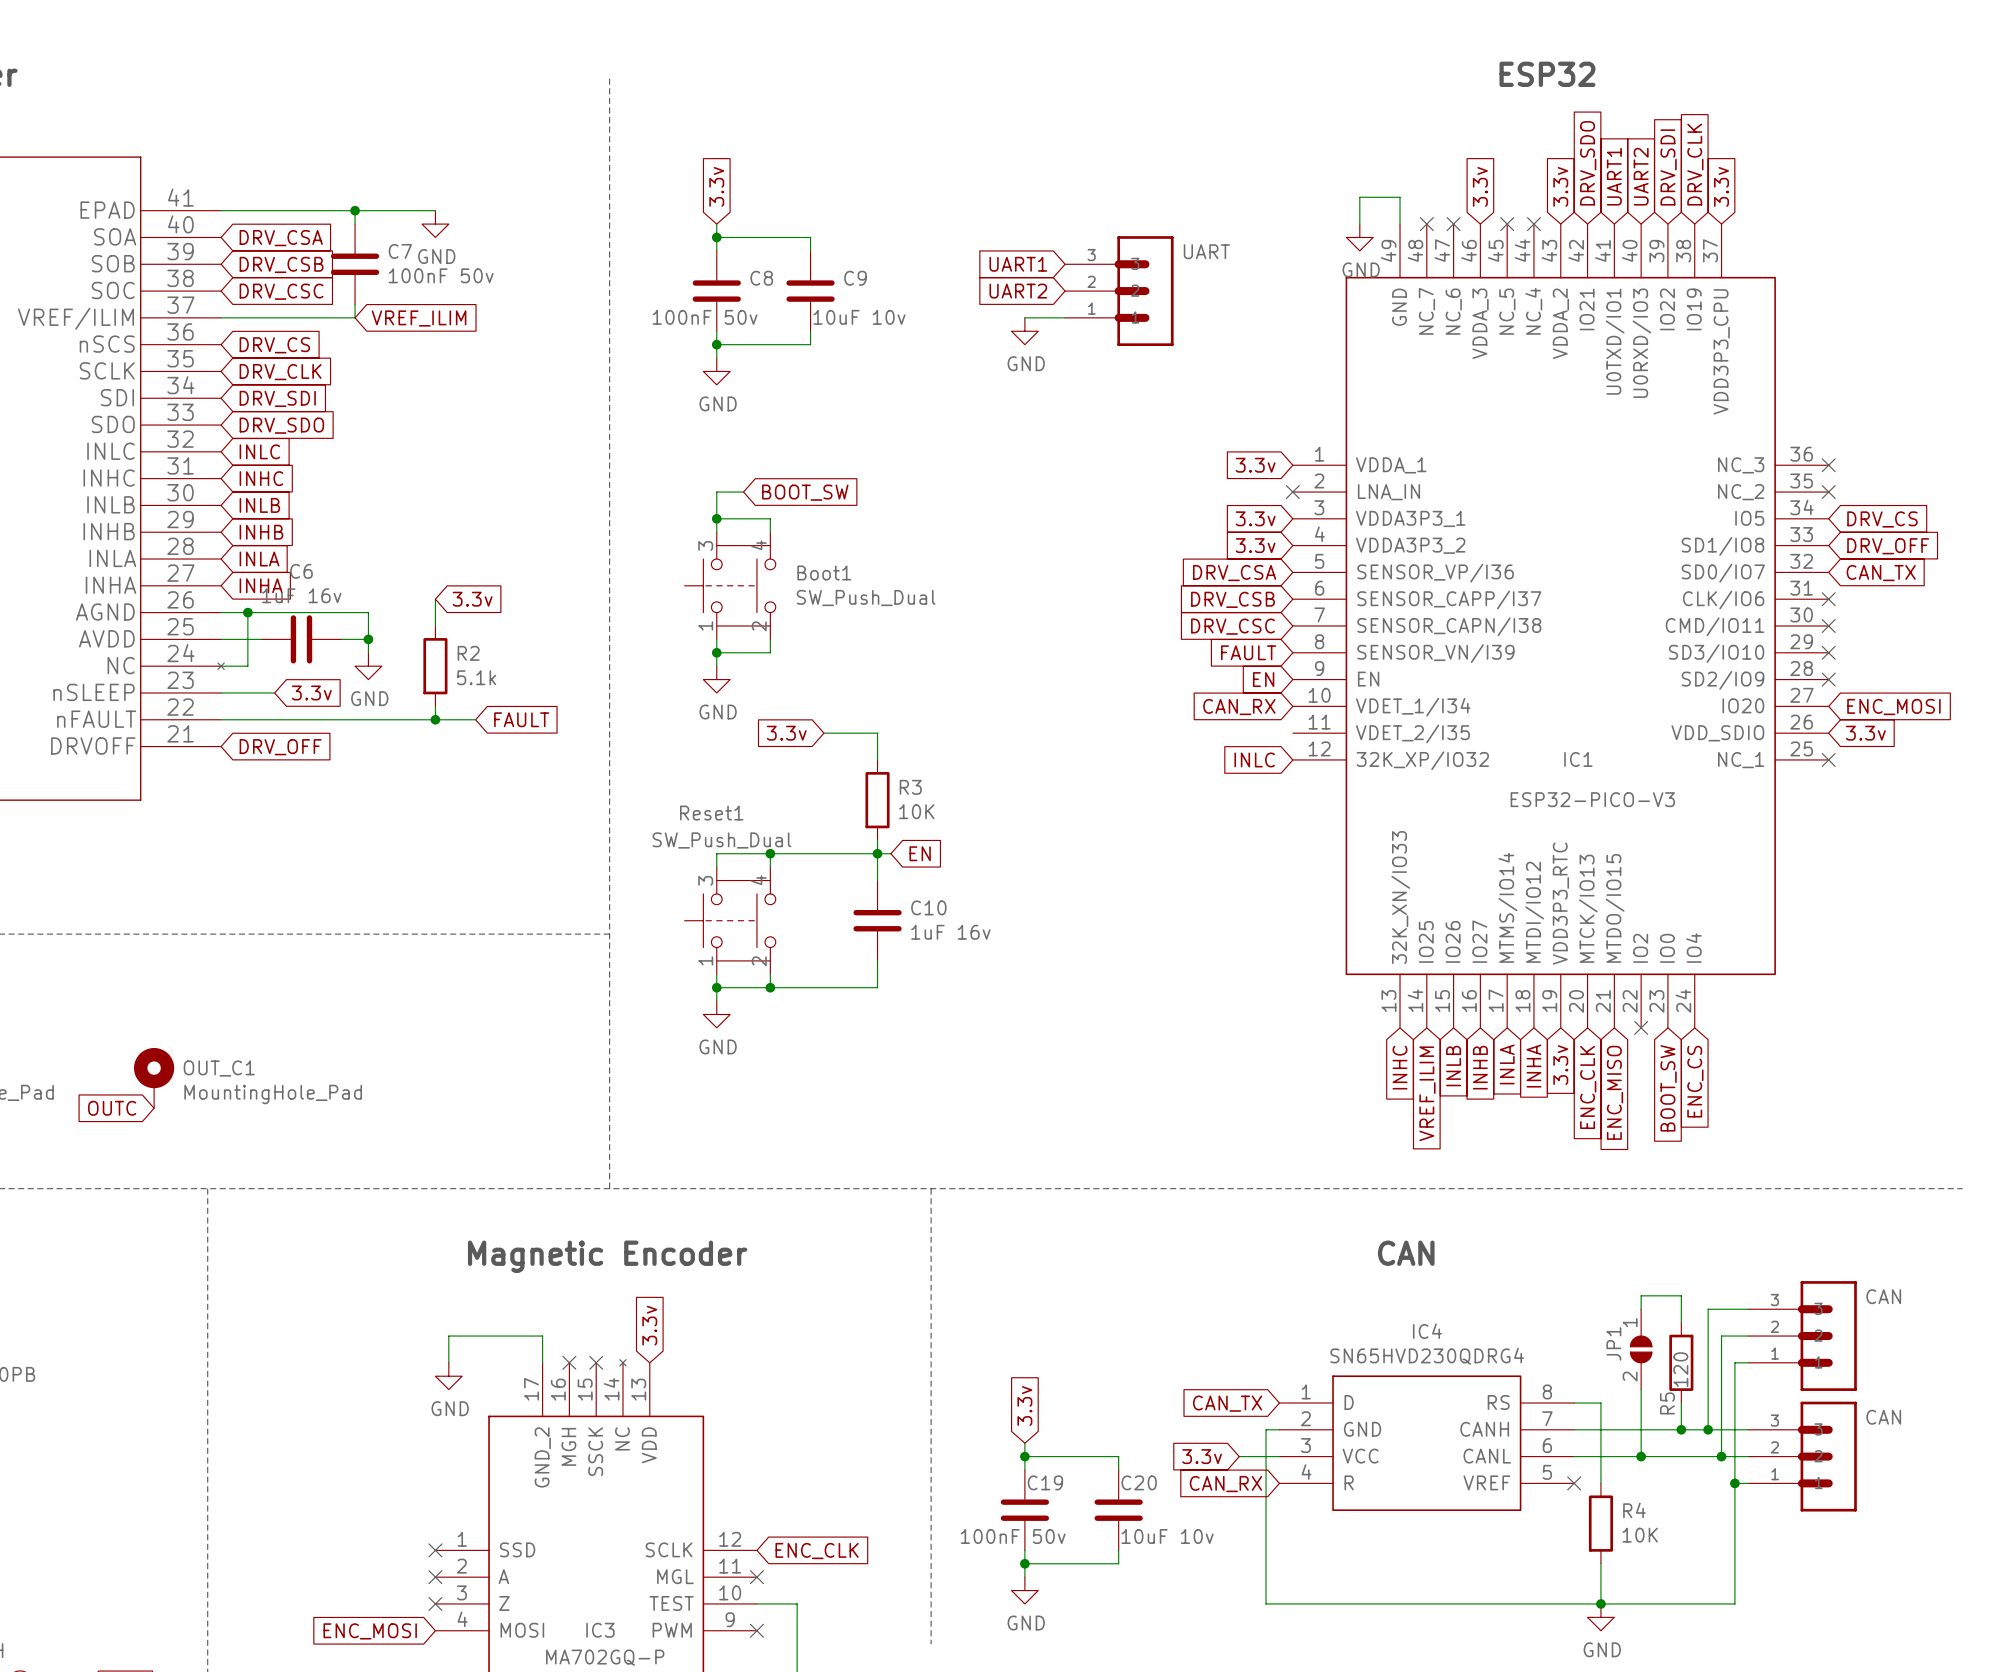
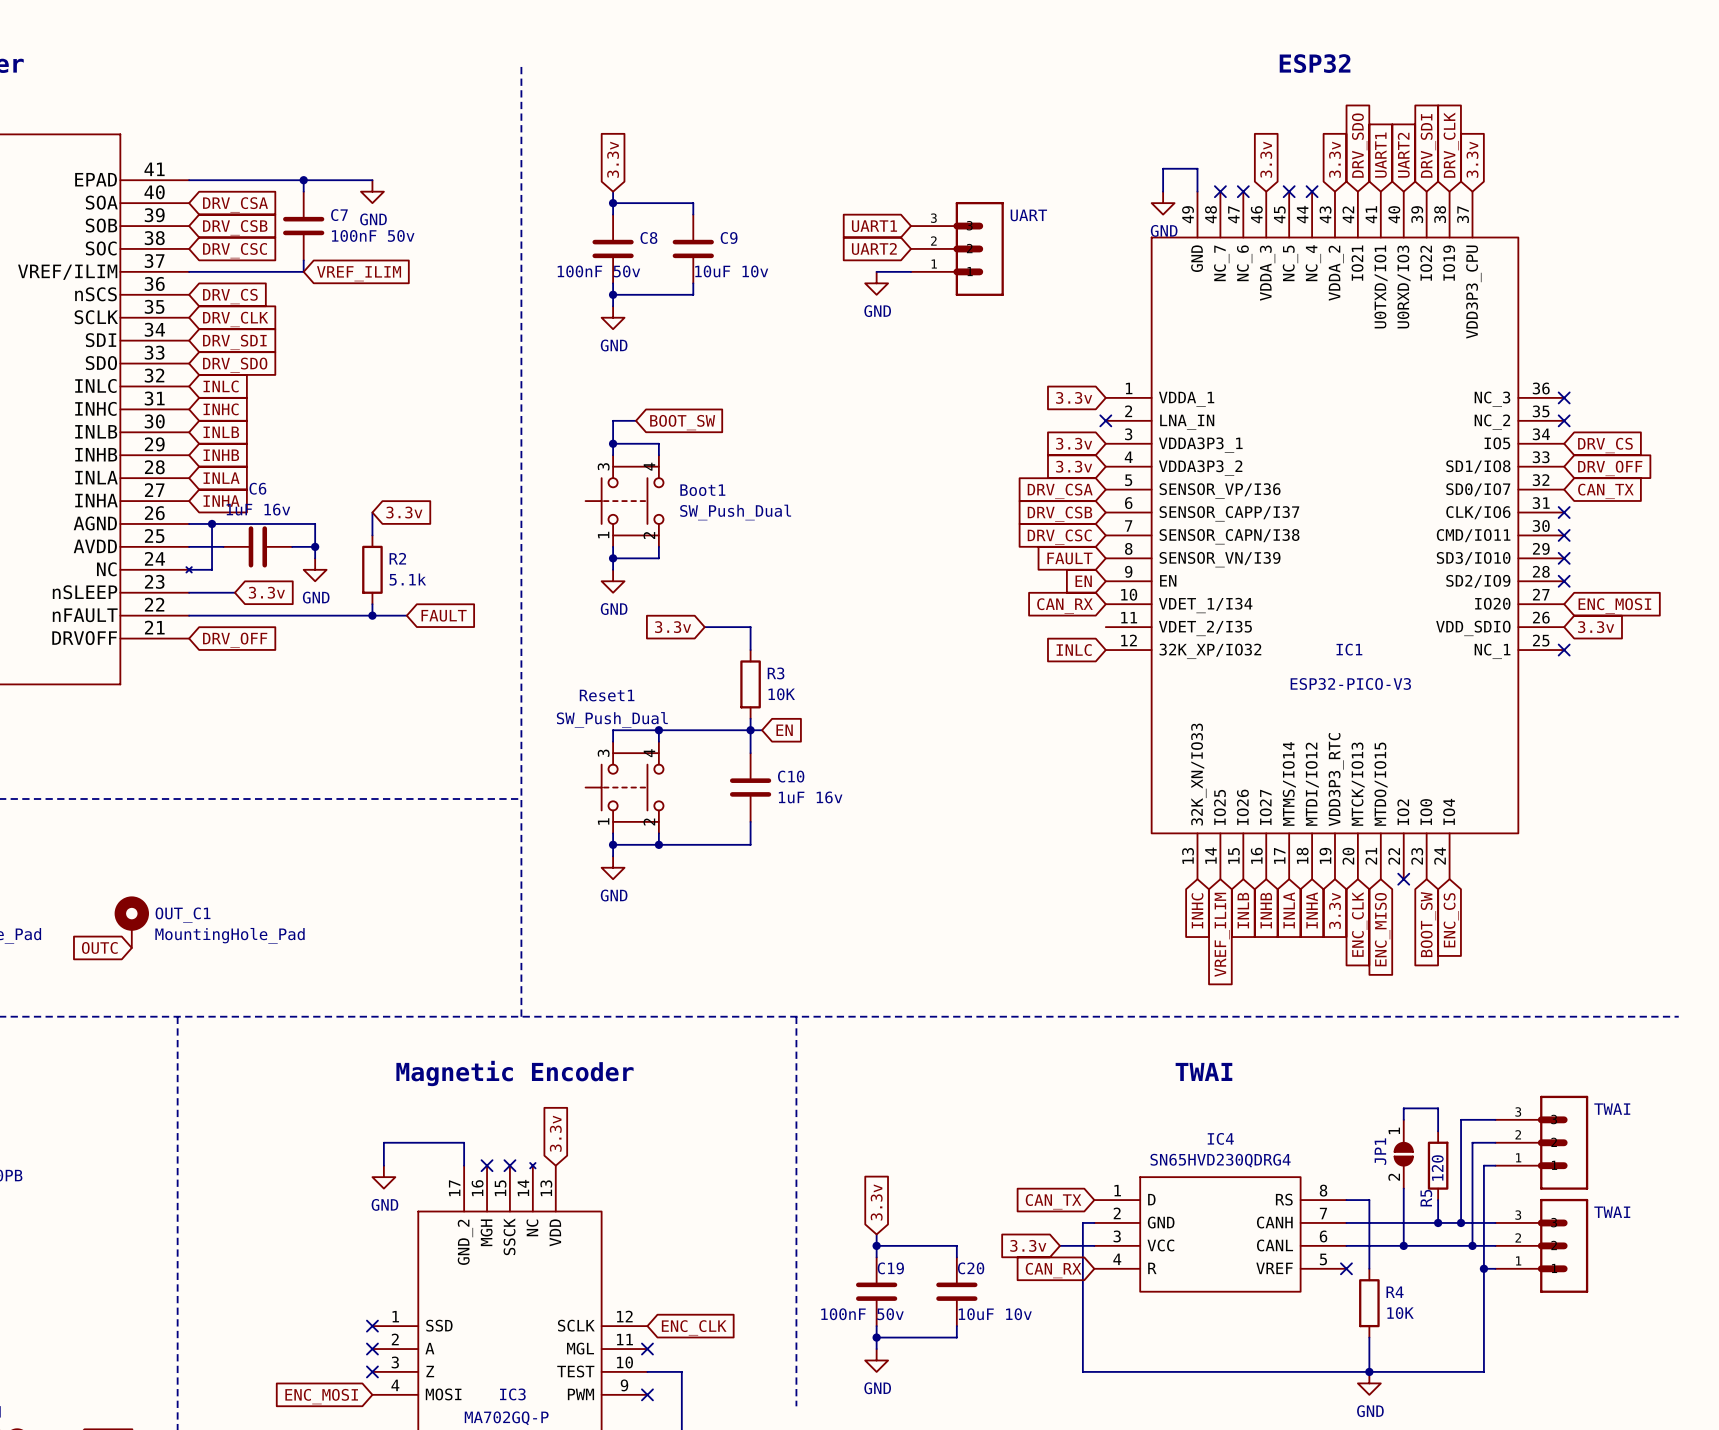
text: CAN (1406, 1253) -> TWAI (1203, 1071)
part value: CAN (1883, 1296) -> TWAI (1612, 1109)
part value: CAN (1883, 1417) -> TWAI (1612, 1212)

